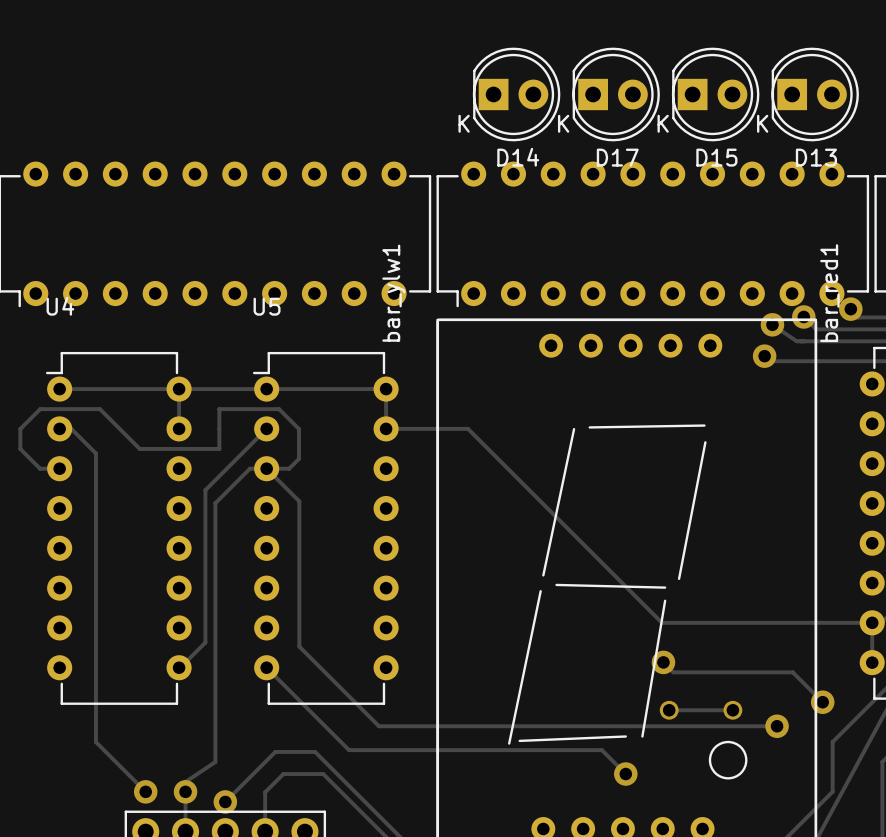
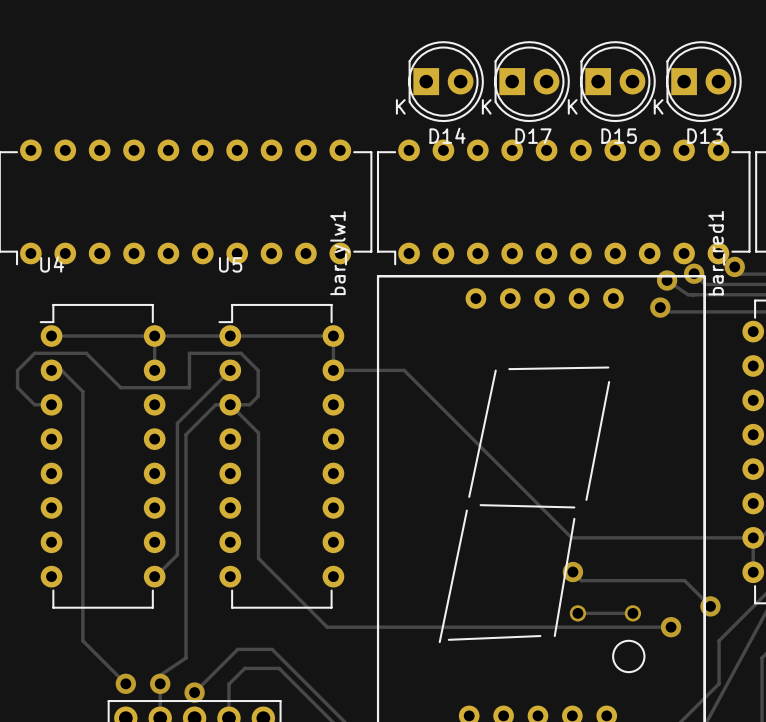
track: (266, 667) (349, 750) (601, 750) (625, 774) -> none
via: (625, 774) -> none

